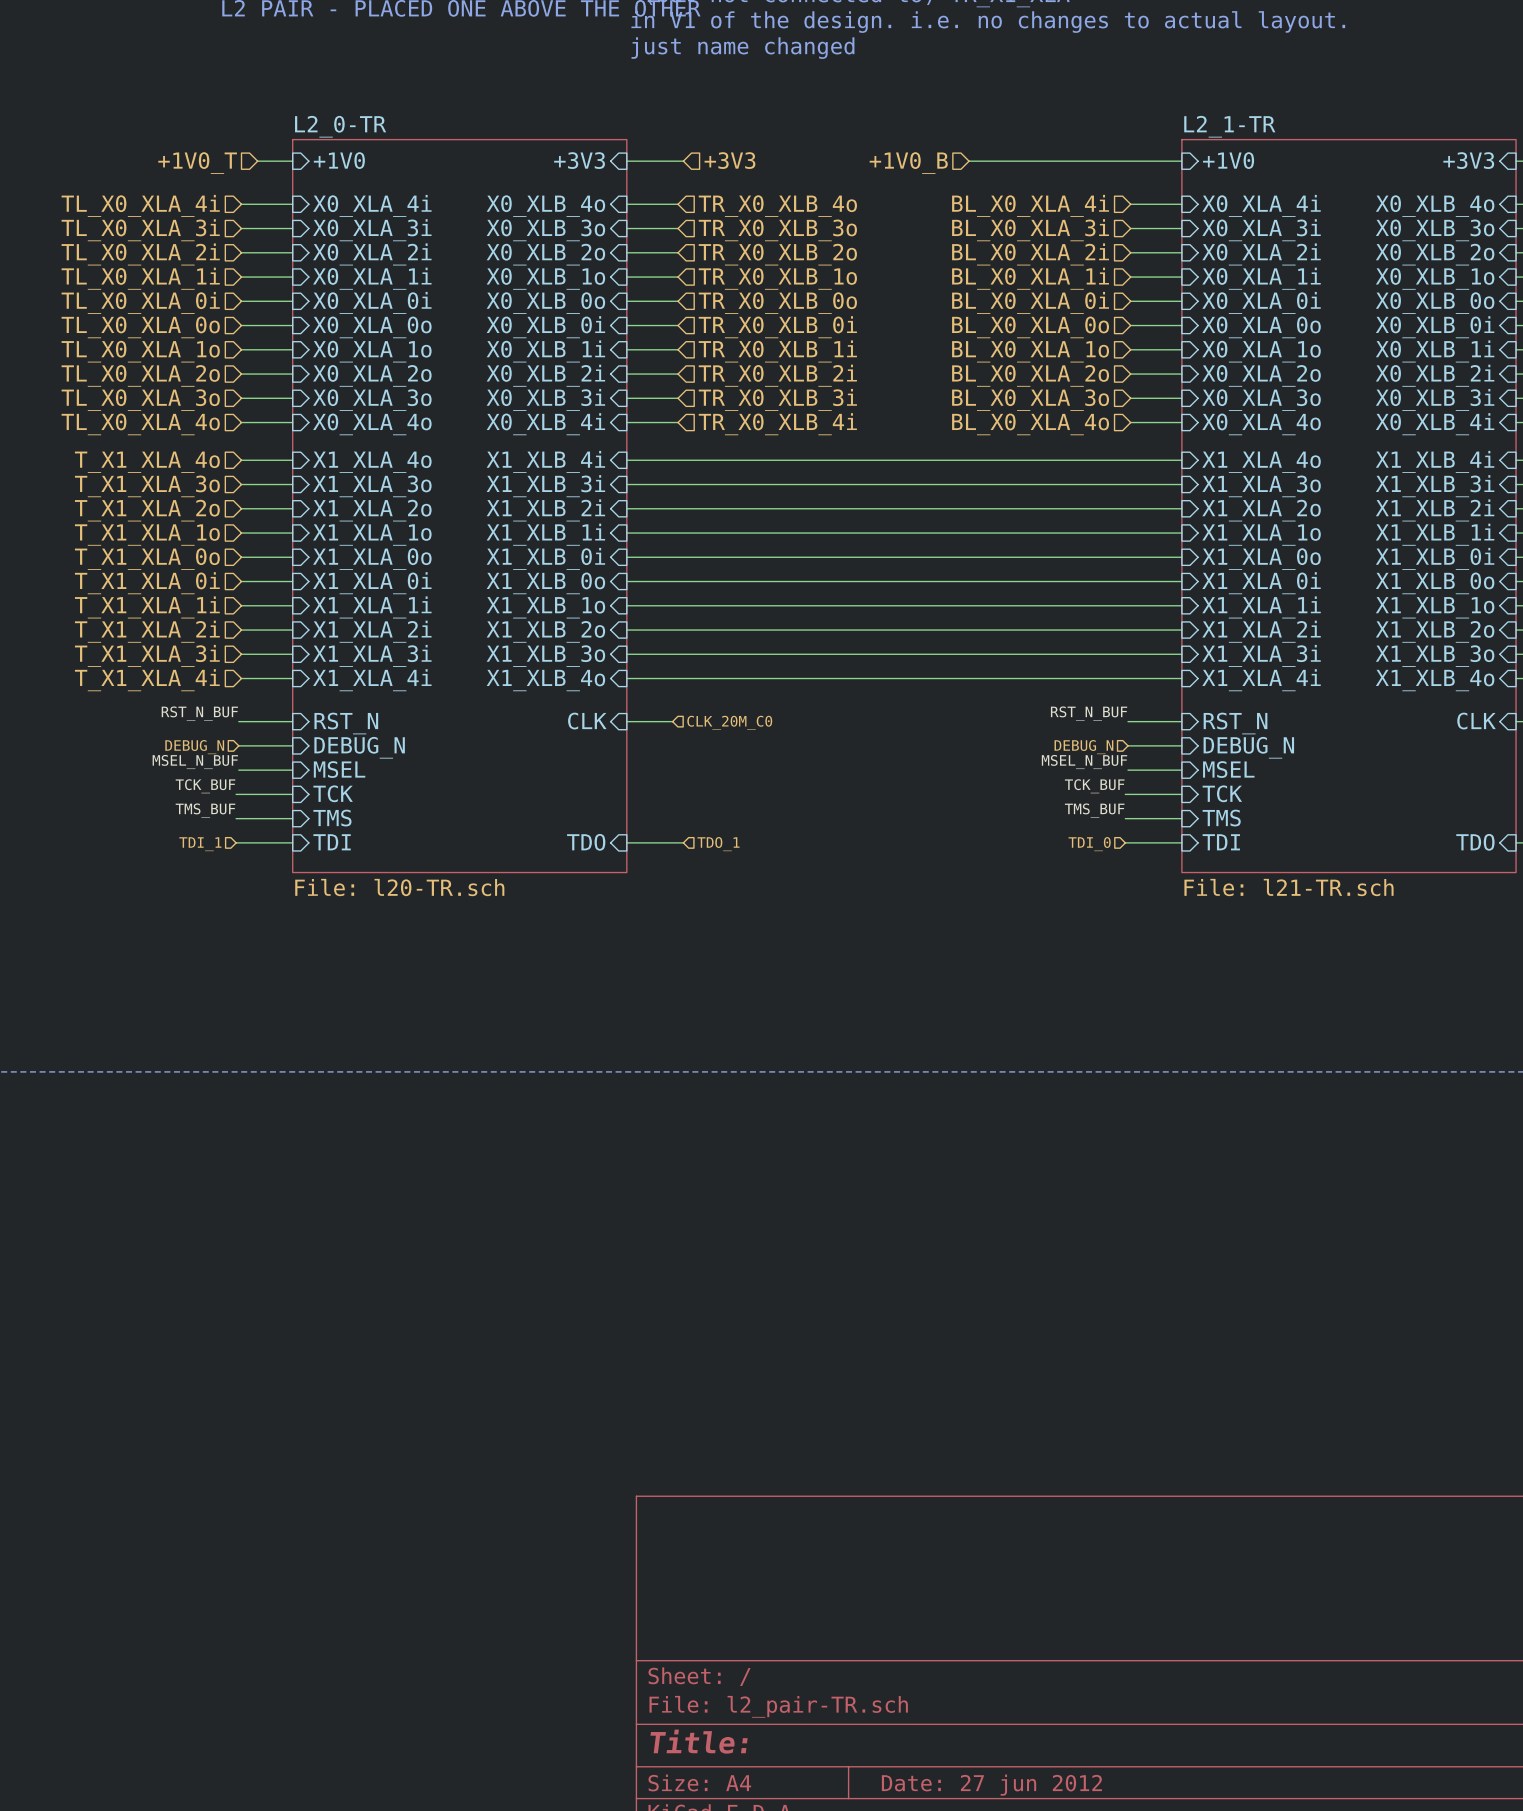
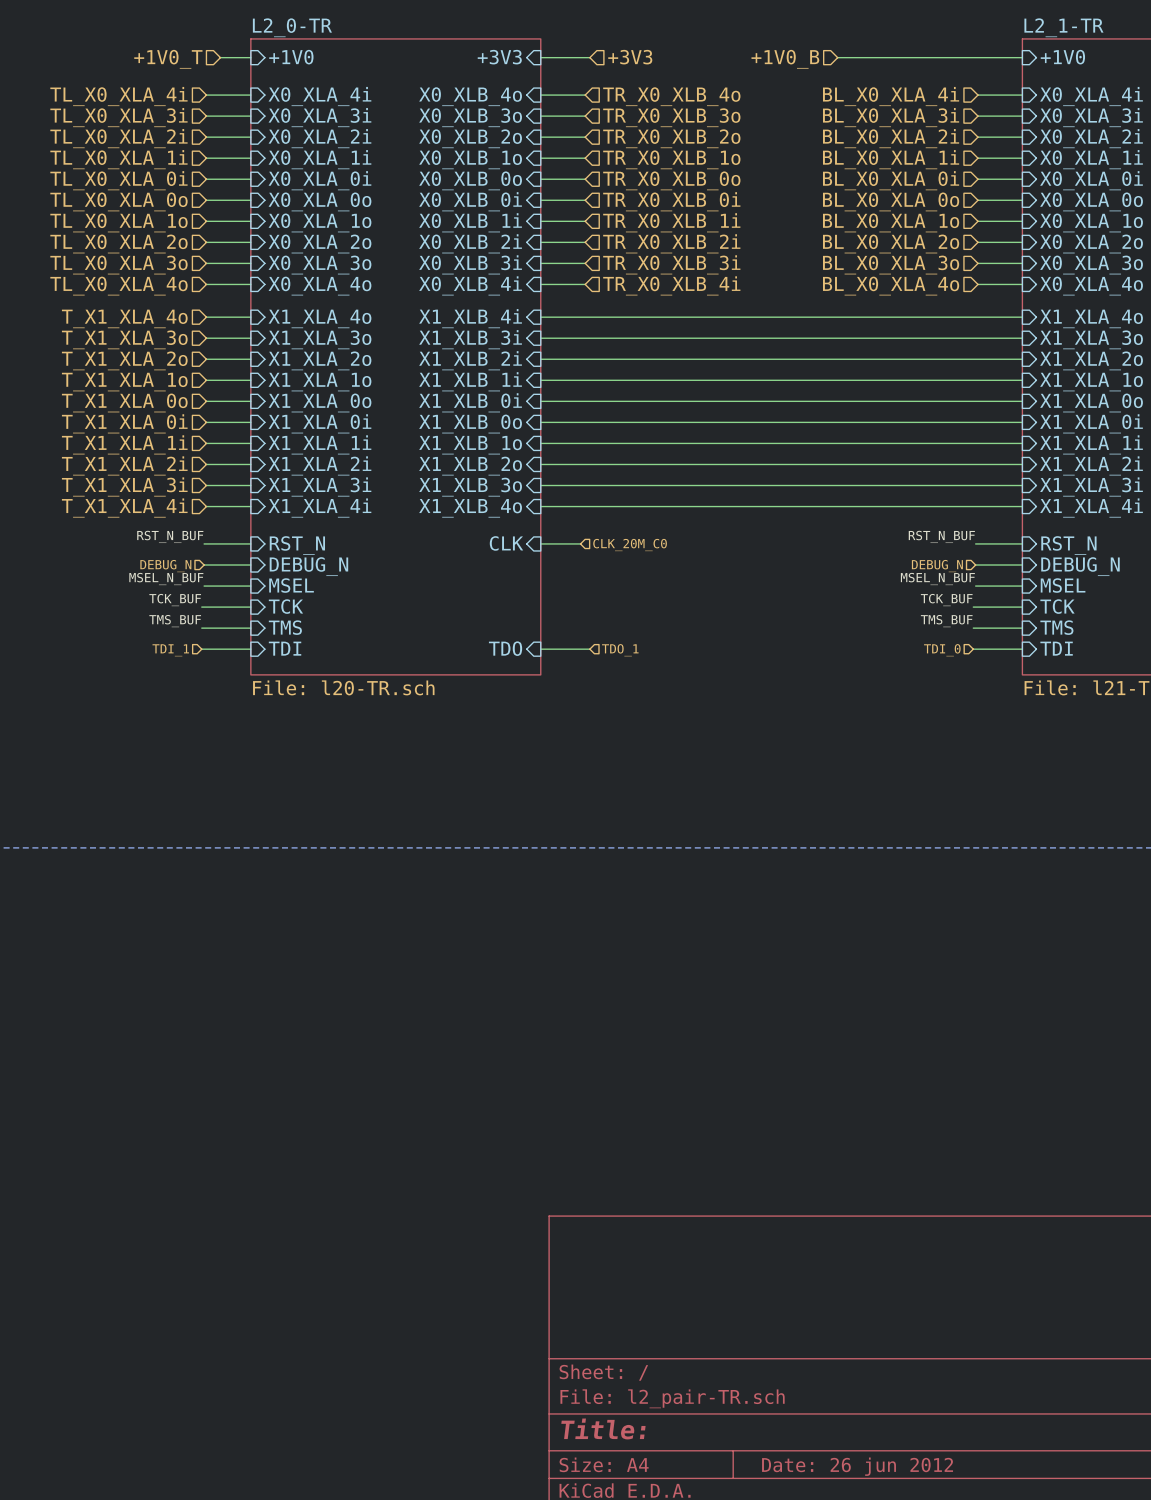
title block: Date: 27 jun 2012 (991, 1785) -> Date: 26 jun 2012 (857, 1466)

